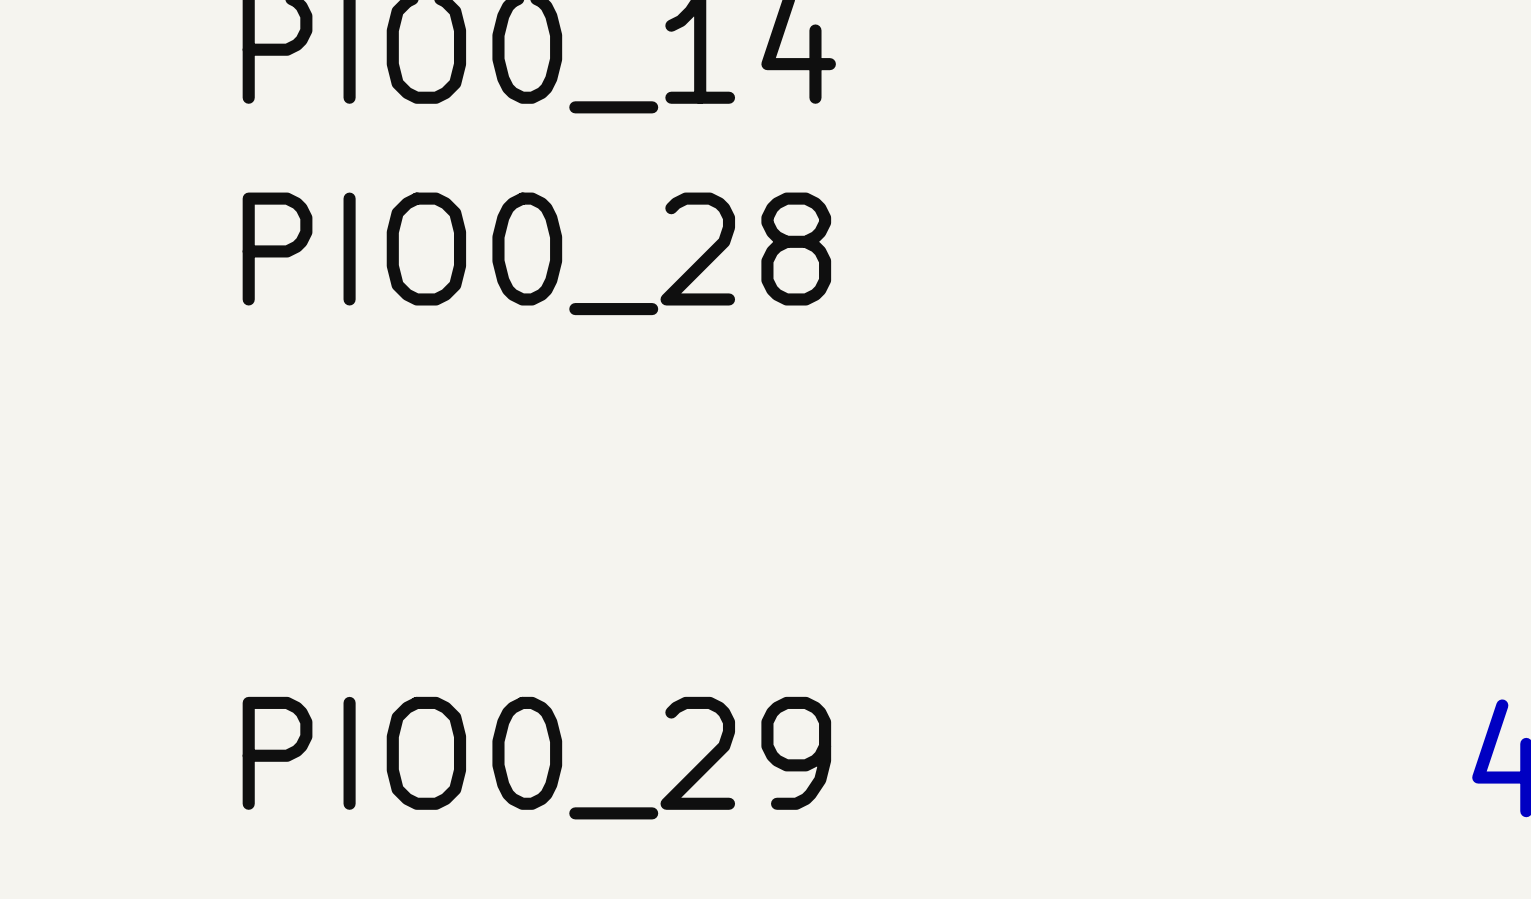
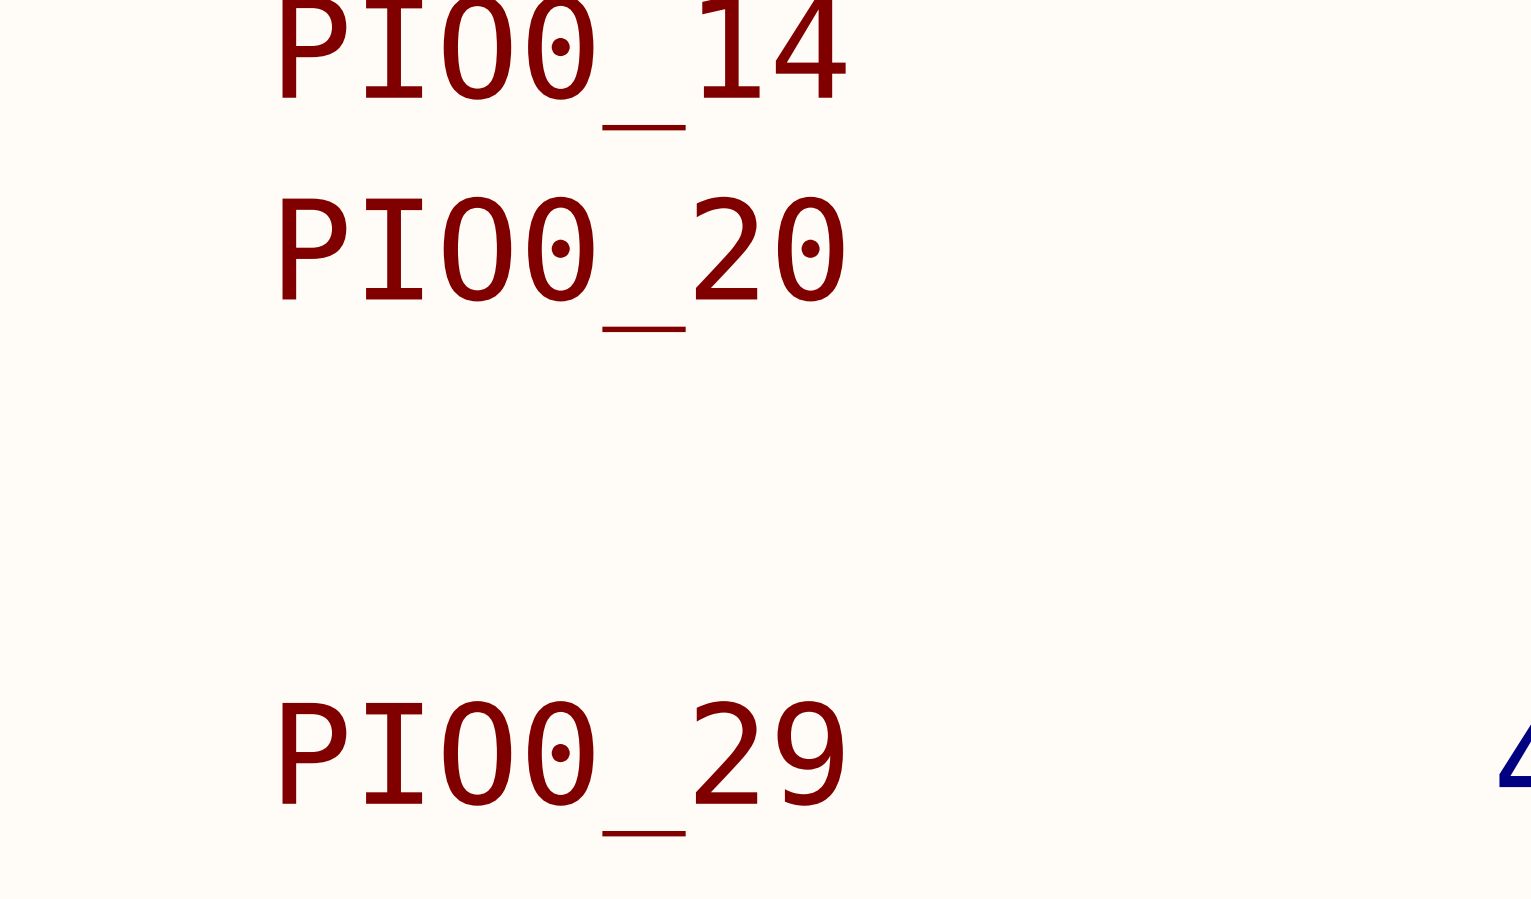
label: PIO0_28 (536, 253) -> PIO0_20 (562, 264)

